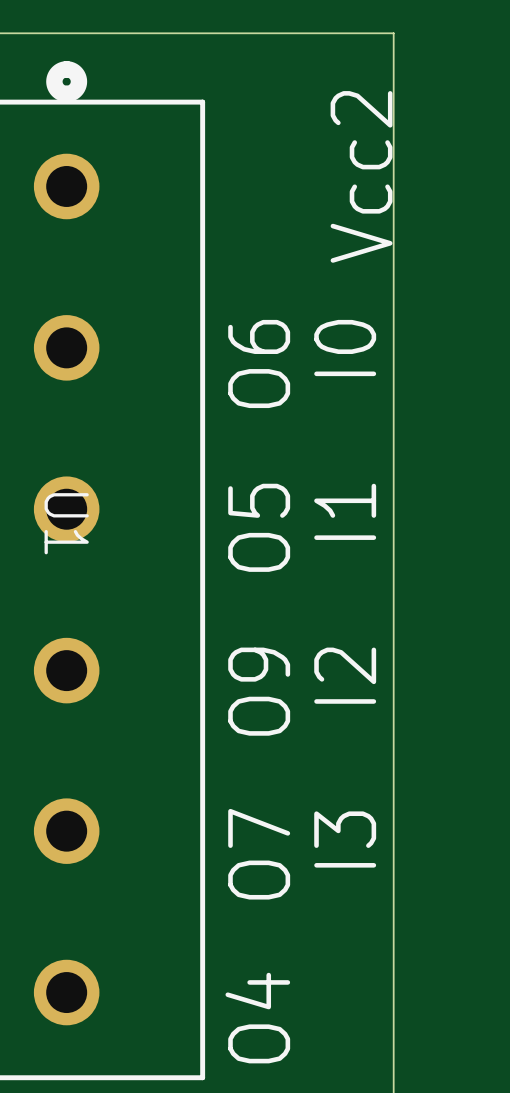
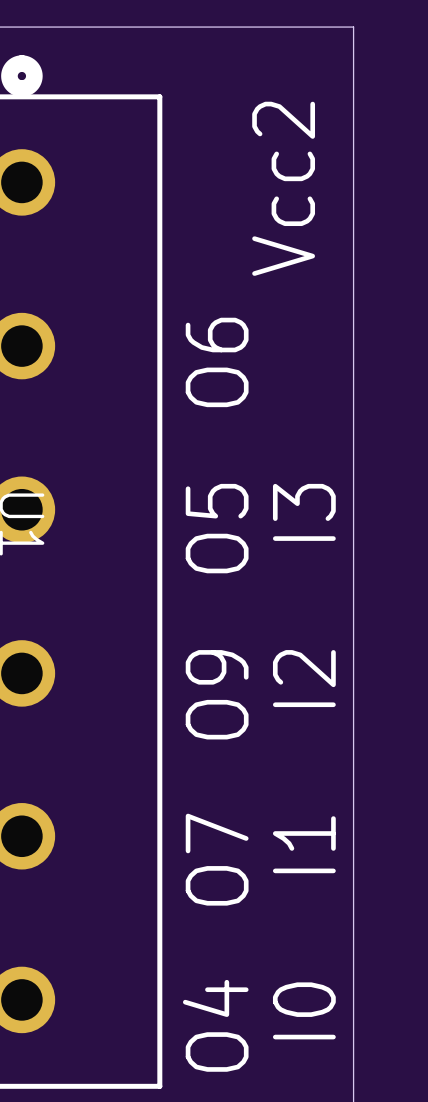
text position: Vcc2 (361, 176) -> Vcc2 (283, 188)
text position: I0 (345, 348) -> I0 (304, 1010)
text: I1 (345, 511) -> I3 (304, 512)
text: I3 (345, 839) -> I1 (304, 844)

